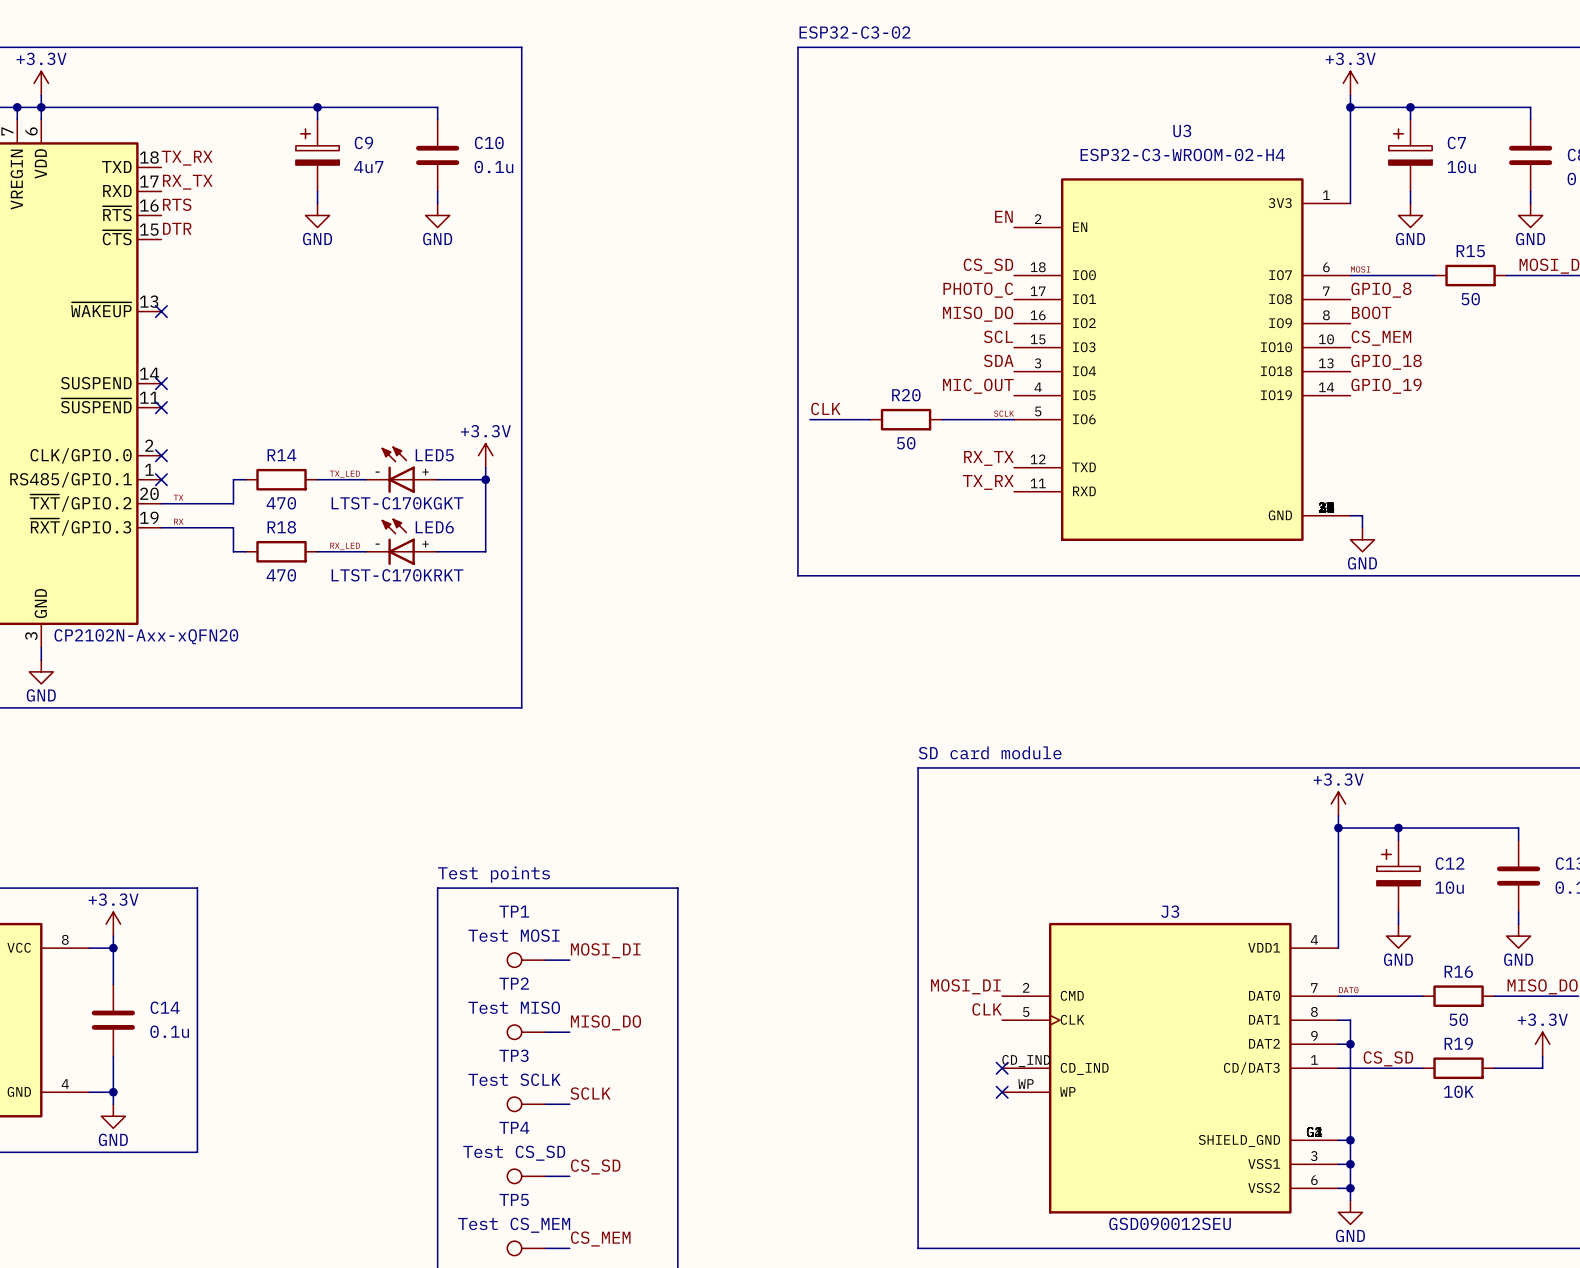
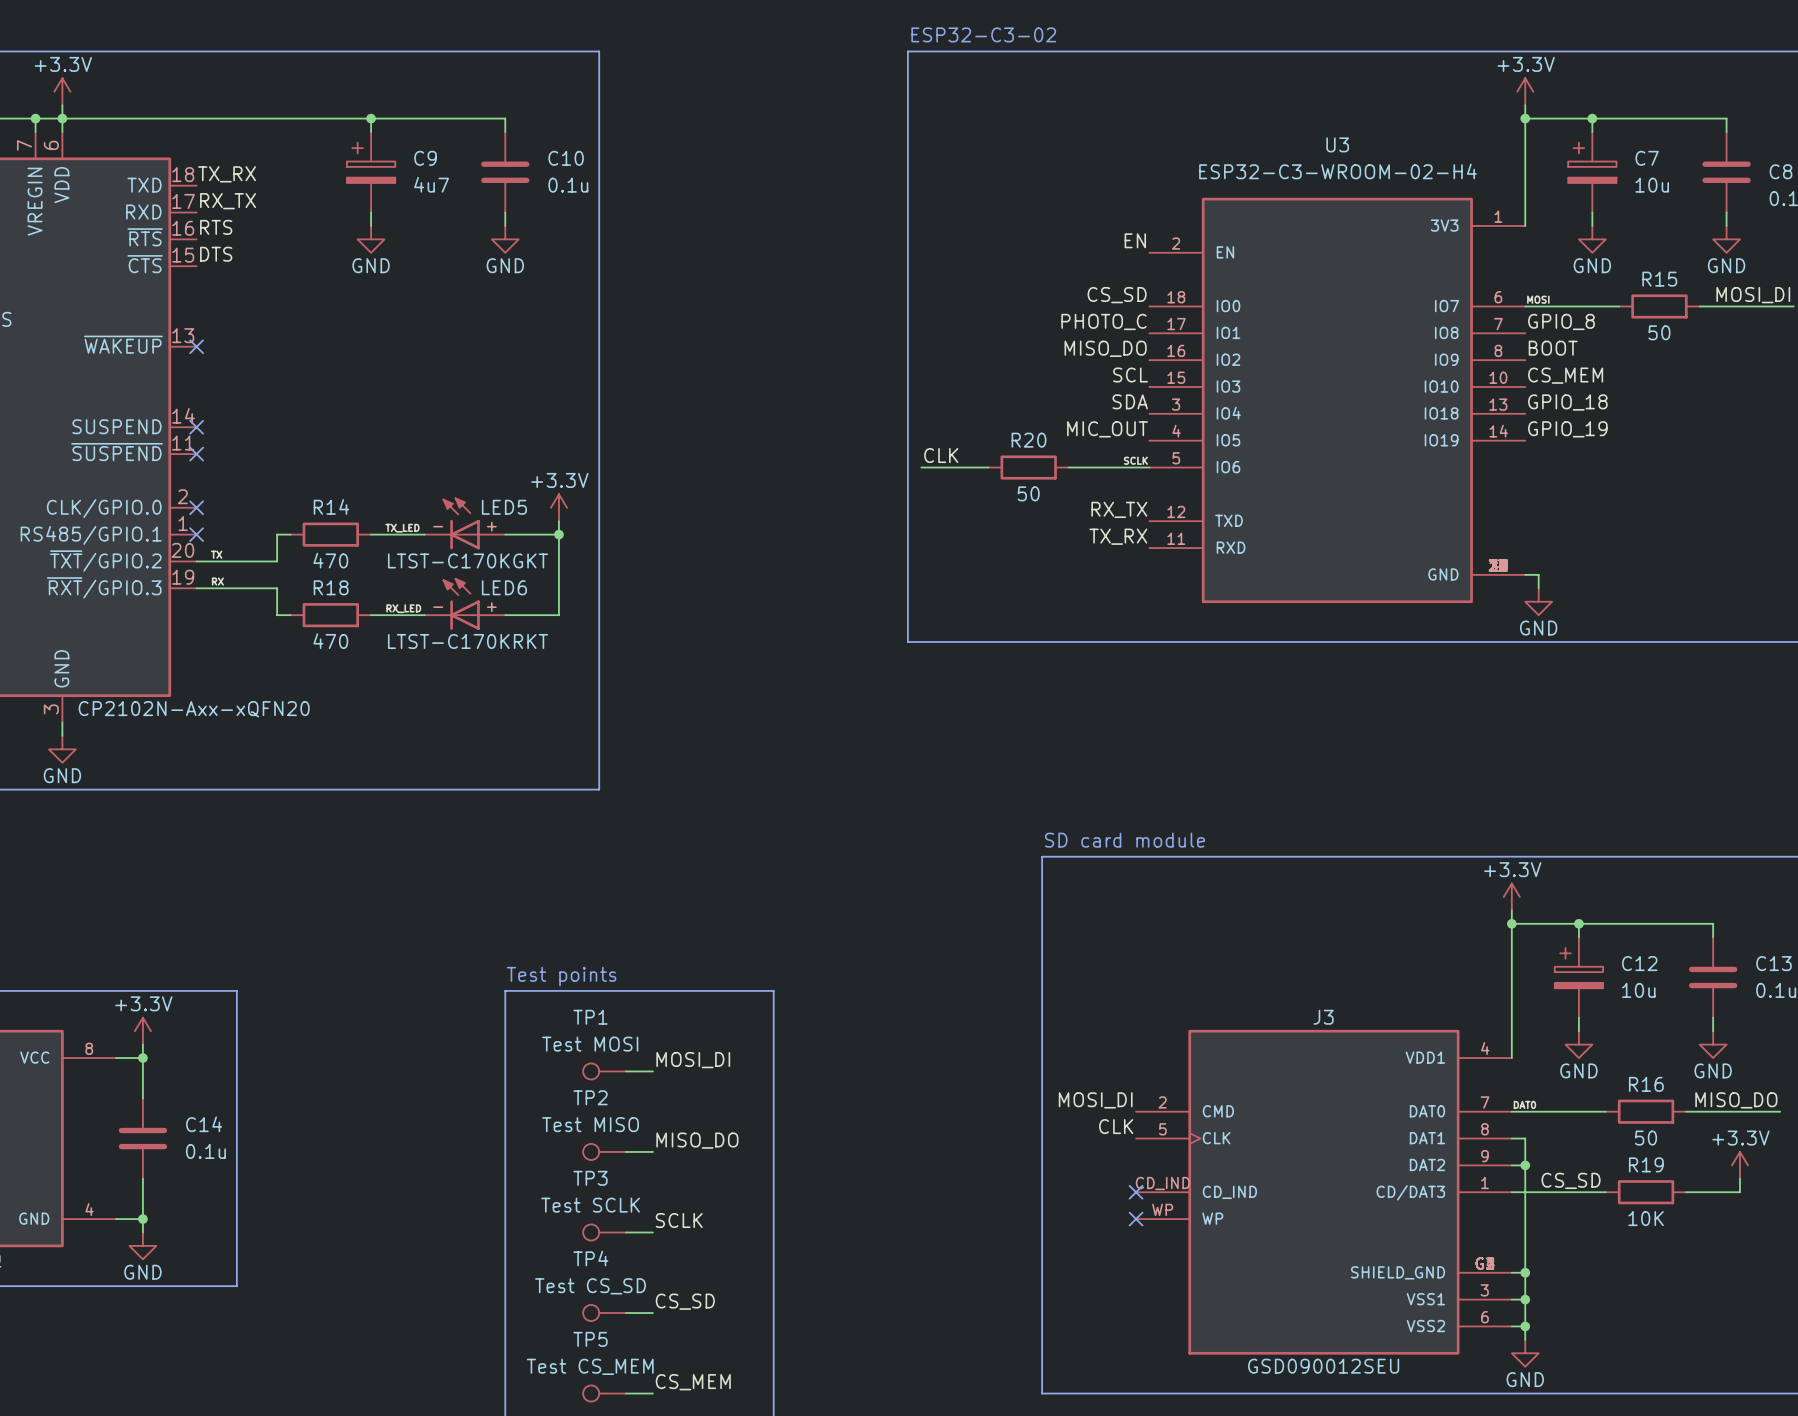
label: DTR (177, 228) -> DTS (216, 254)

